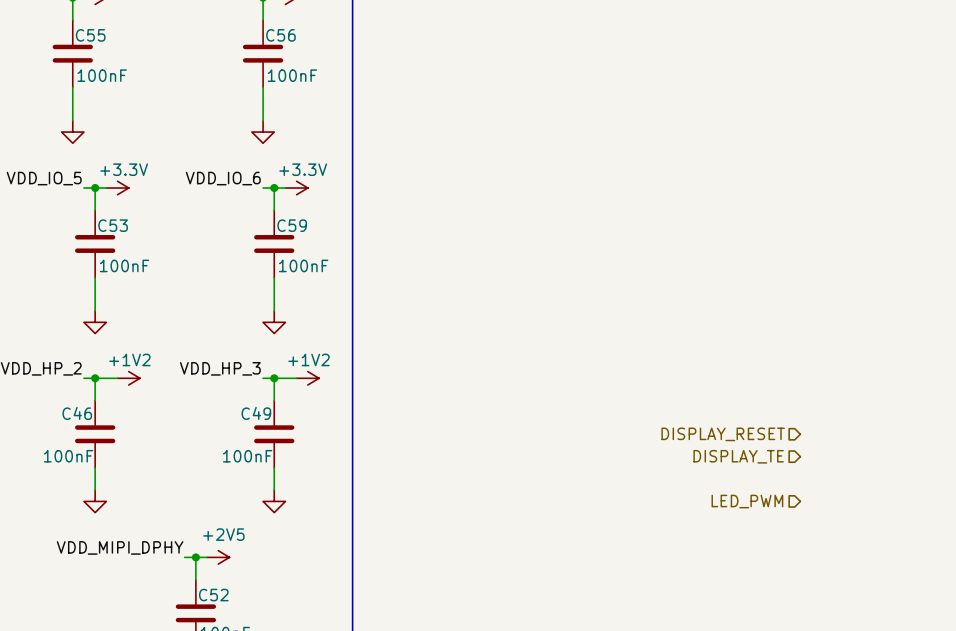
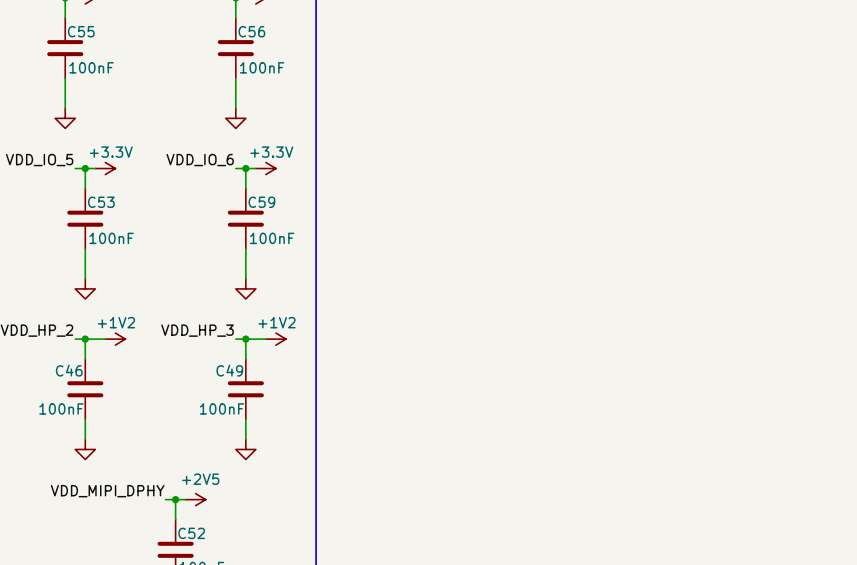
hierarchical label: DISPLAY_RESET (723, 434) -> none
hierarchical label: DISPLAY_TE (738, 456) -> none
hierarchical label: LED_PWM (747, 501) -> none

